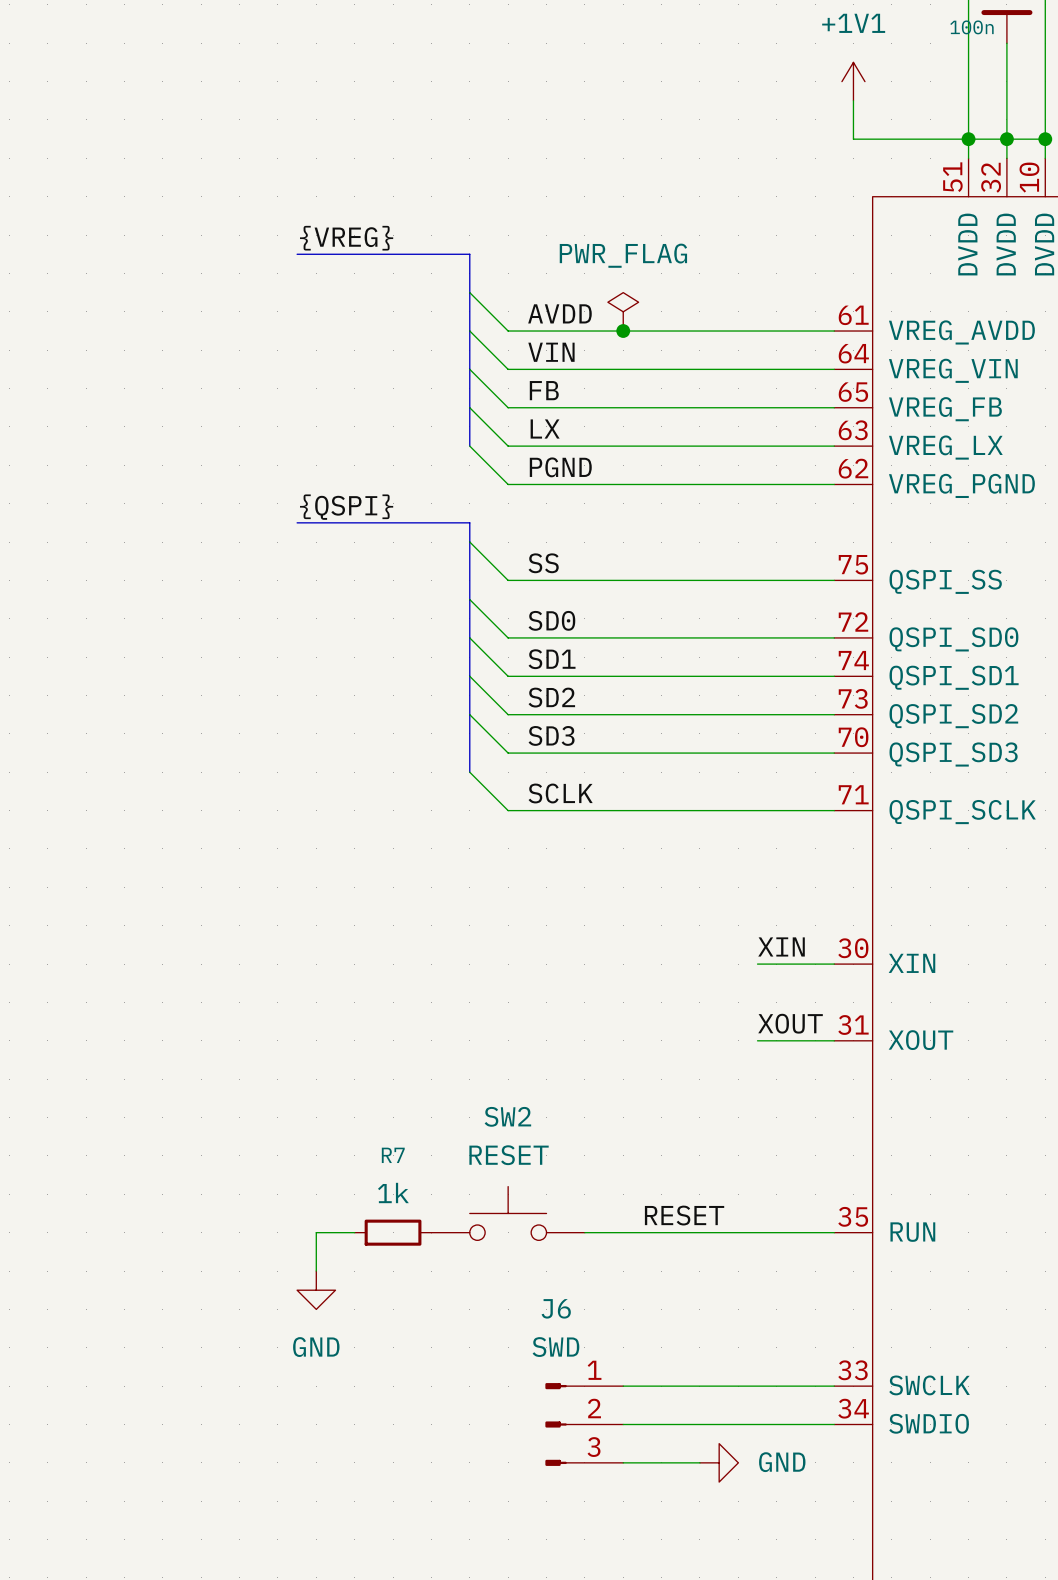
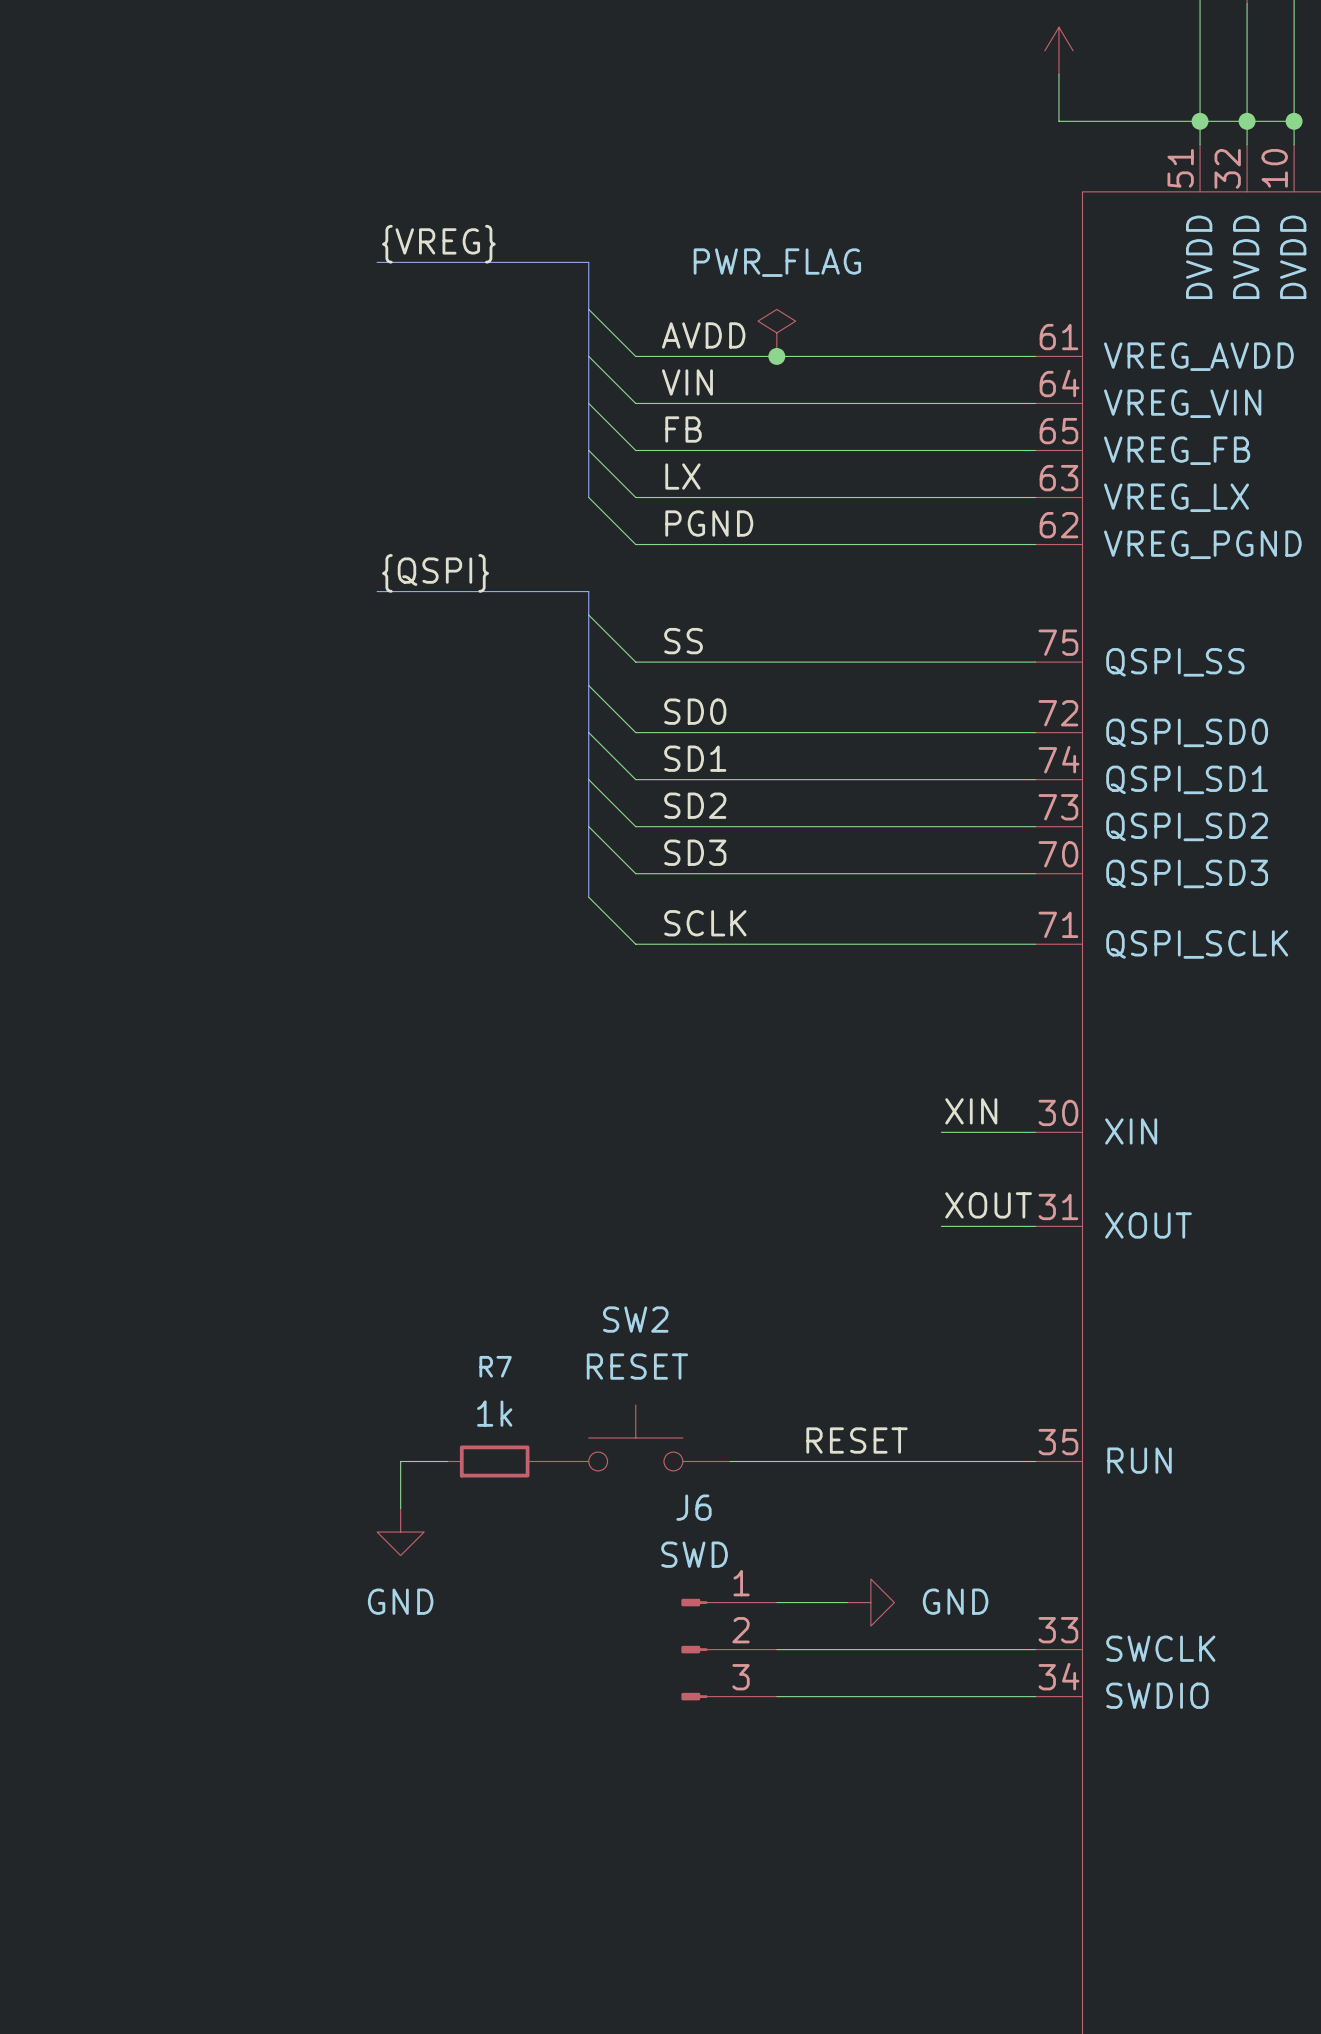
wire: none -> (776, 1602) (847, 1602)
J6 position: (584, 1424) -> (729, 1649)
wire: (623, 1462) (699, 1462) -> none
power symbol position: GND (719, 1462) -> GND (870, 1602)

